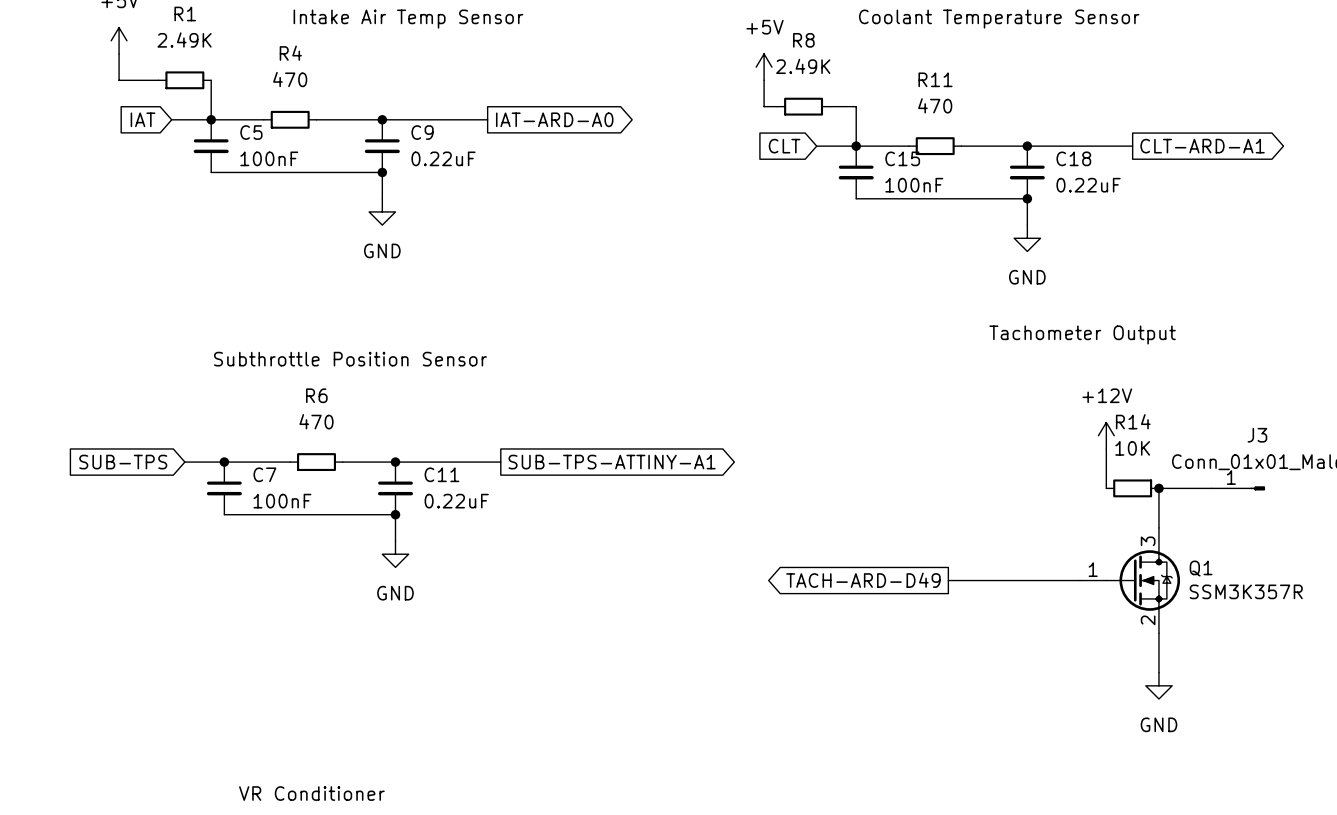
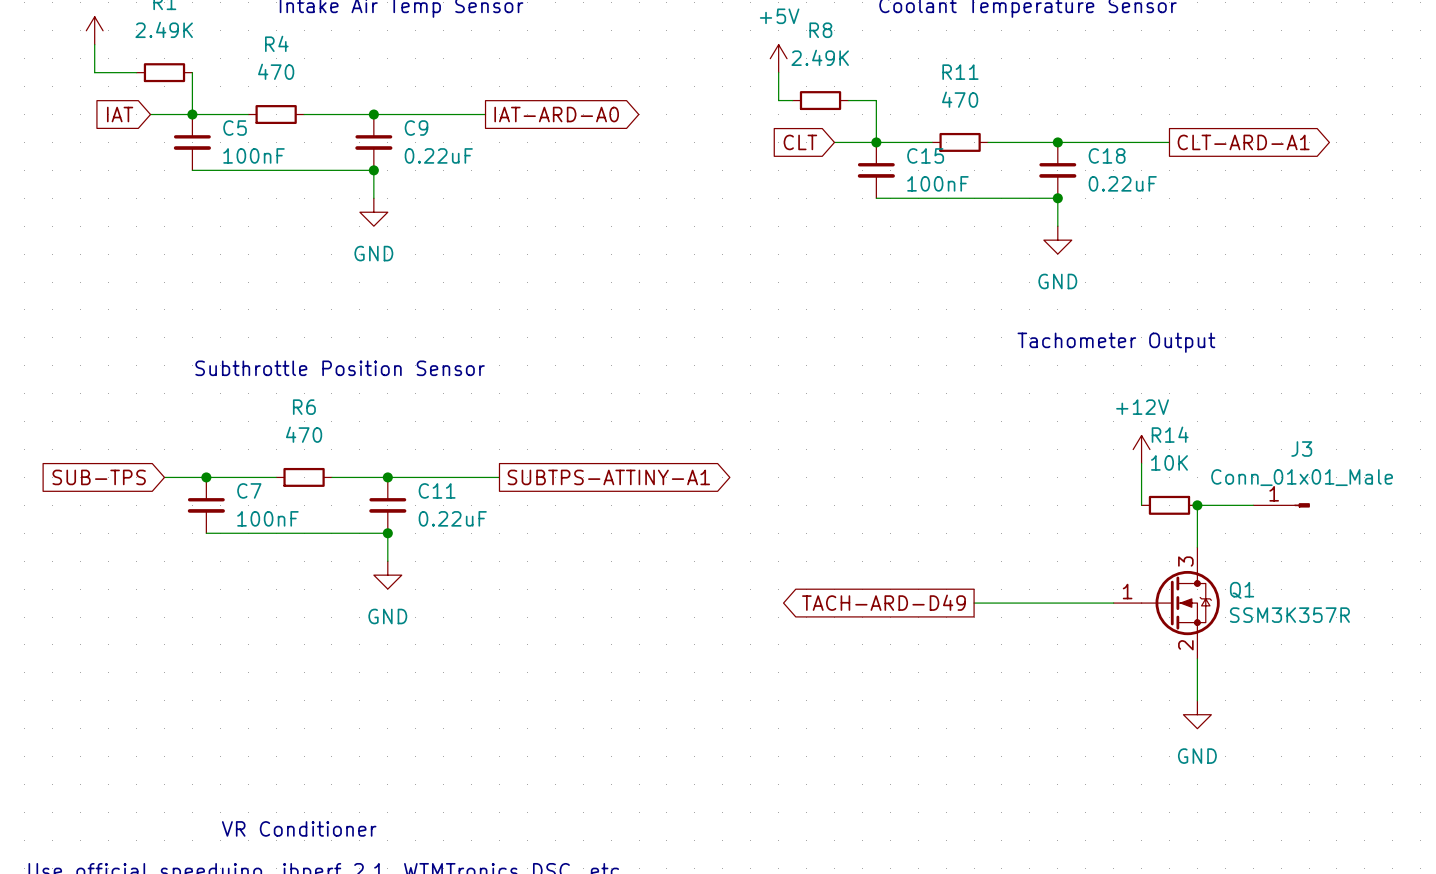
global label: SUB-TPS-ATTINY-A1 (612, 462) -> SUBTPS-ATTINY-A1 (608, 477)

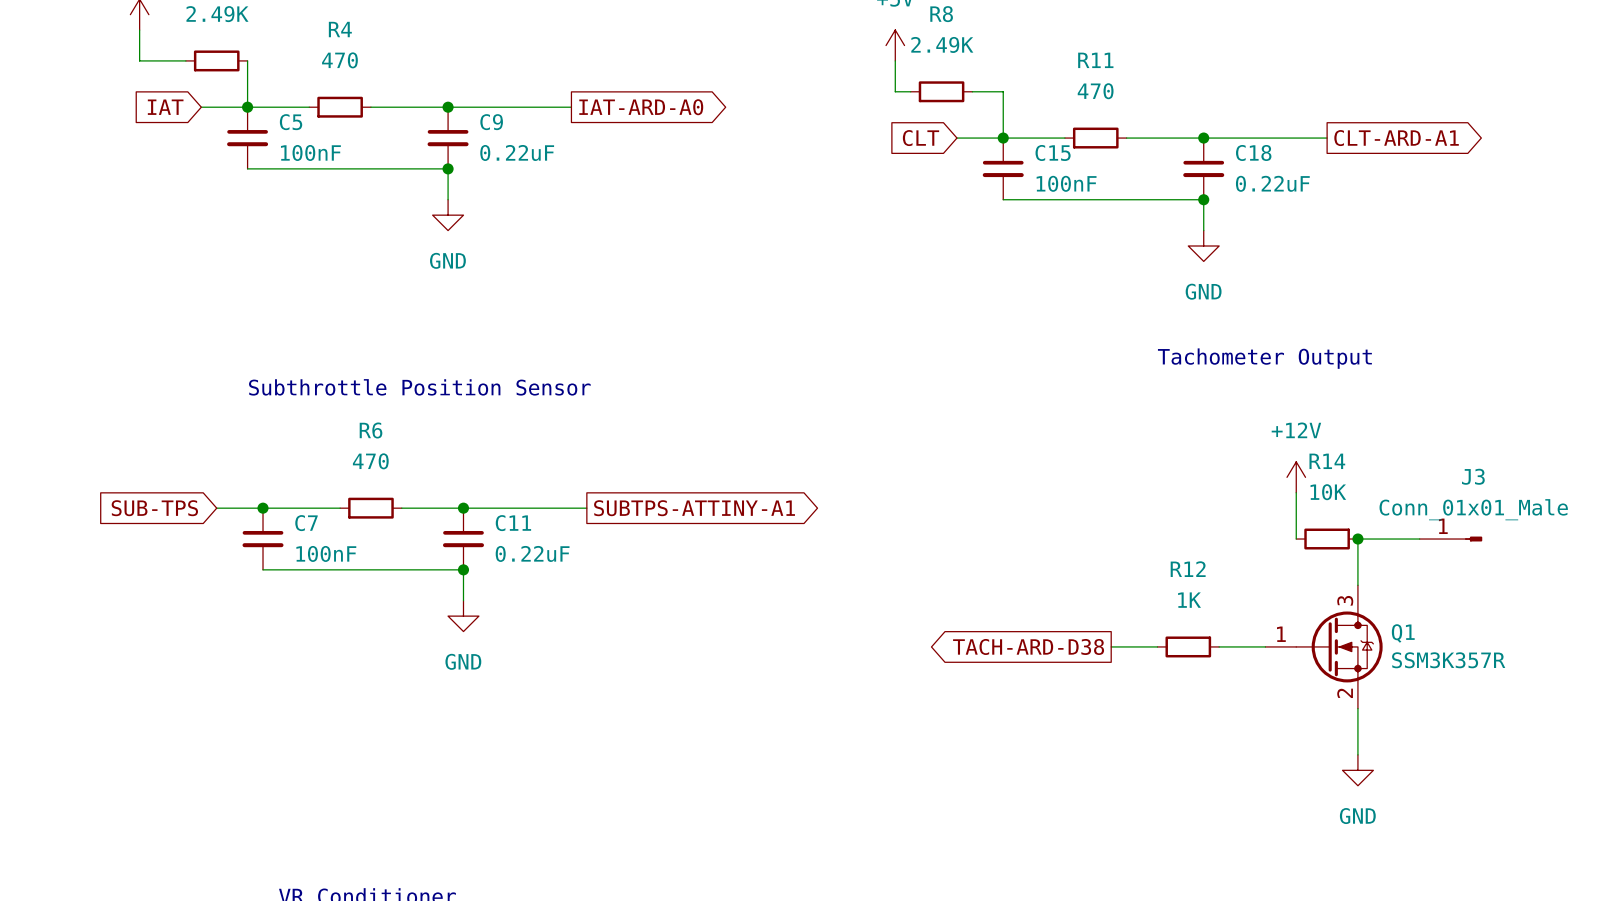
global label: TACH-ARD-D49 (883, 602) -> TACH-ARD-D38 (1028, 646)
wire: (1015, 603) (1071, 603) -> none
R12: none -> 1K (1188, 646)

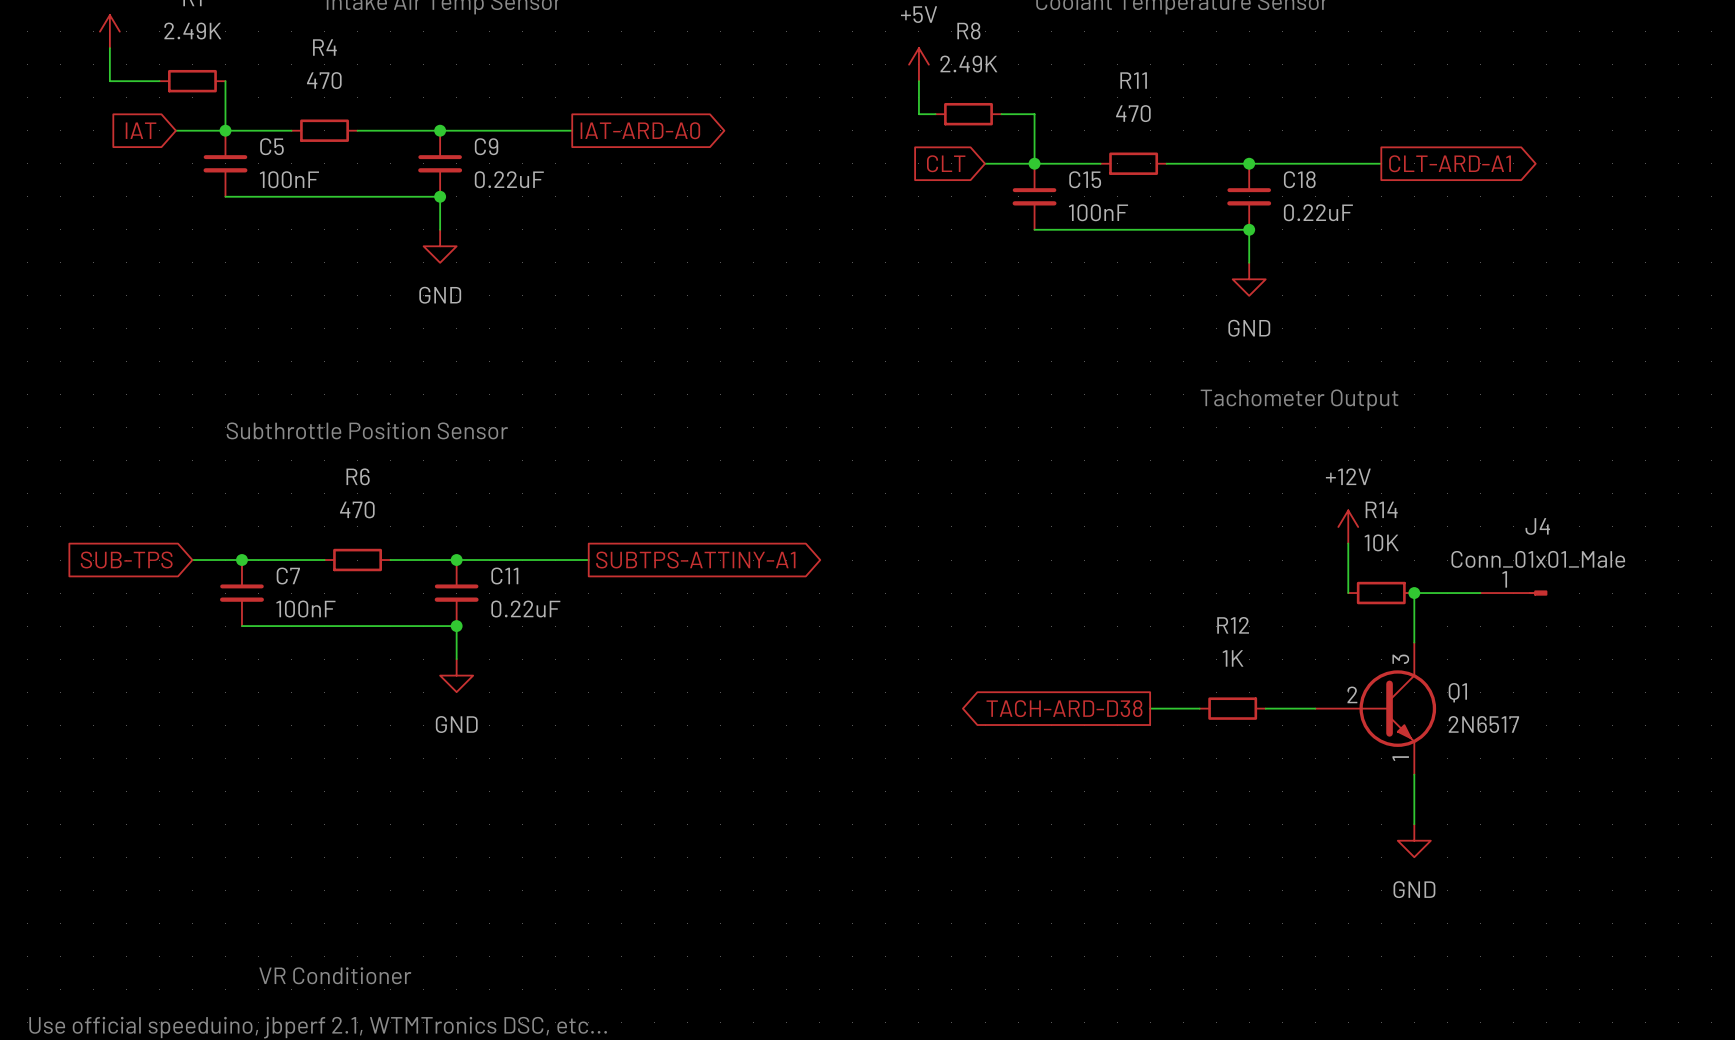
J3 name: J3 (1473, 476) -> J4 (1537, 526)
Q1 symbol: [1265, 585, 1383, 709] -> [1315, 642, 1437, 775]
Q1 value: SSM3K357R (1448, 660) -> 2N6517 (1483, 724)

